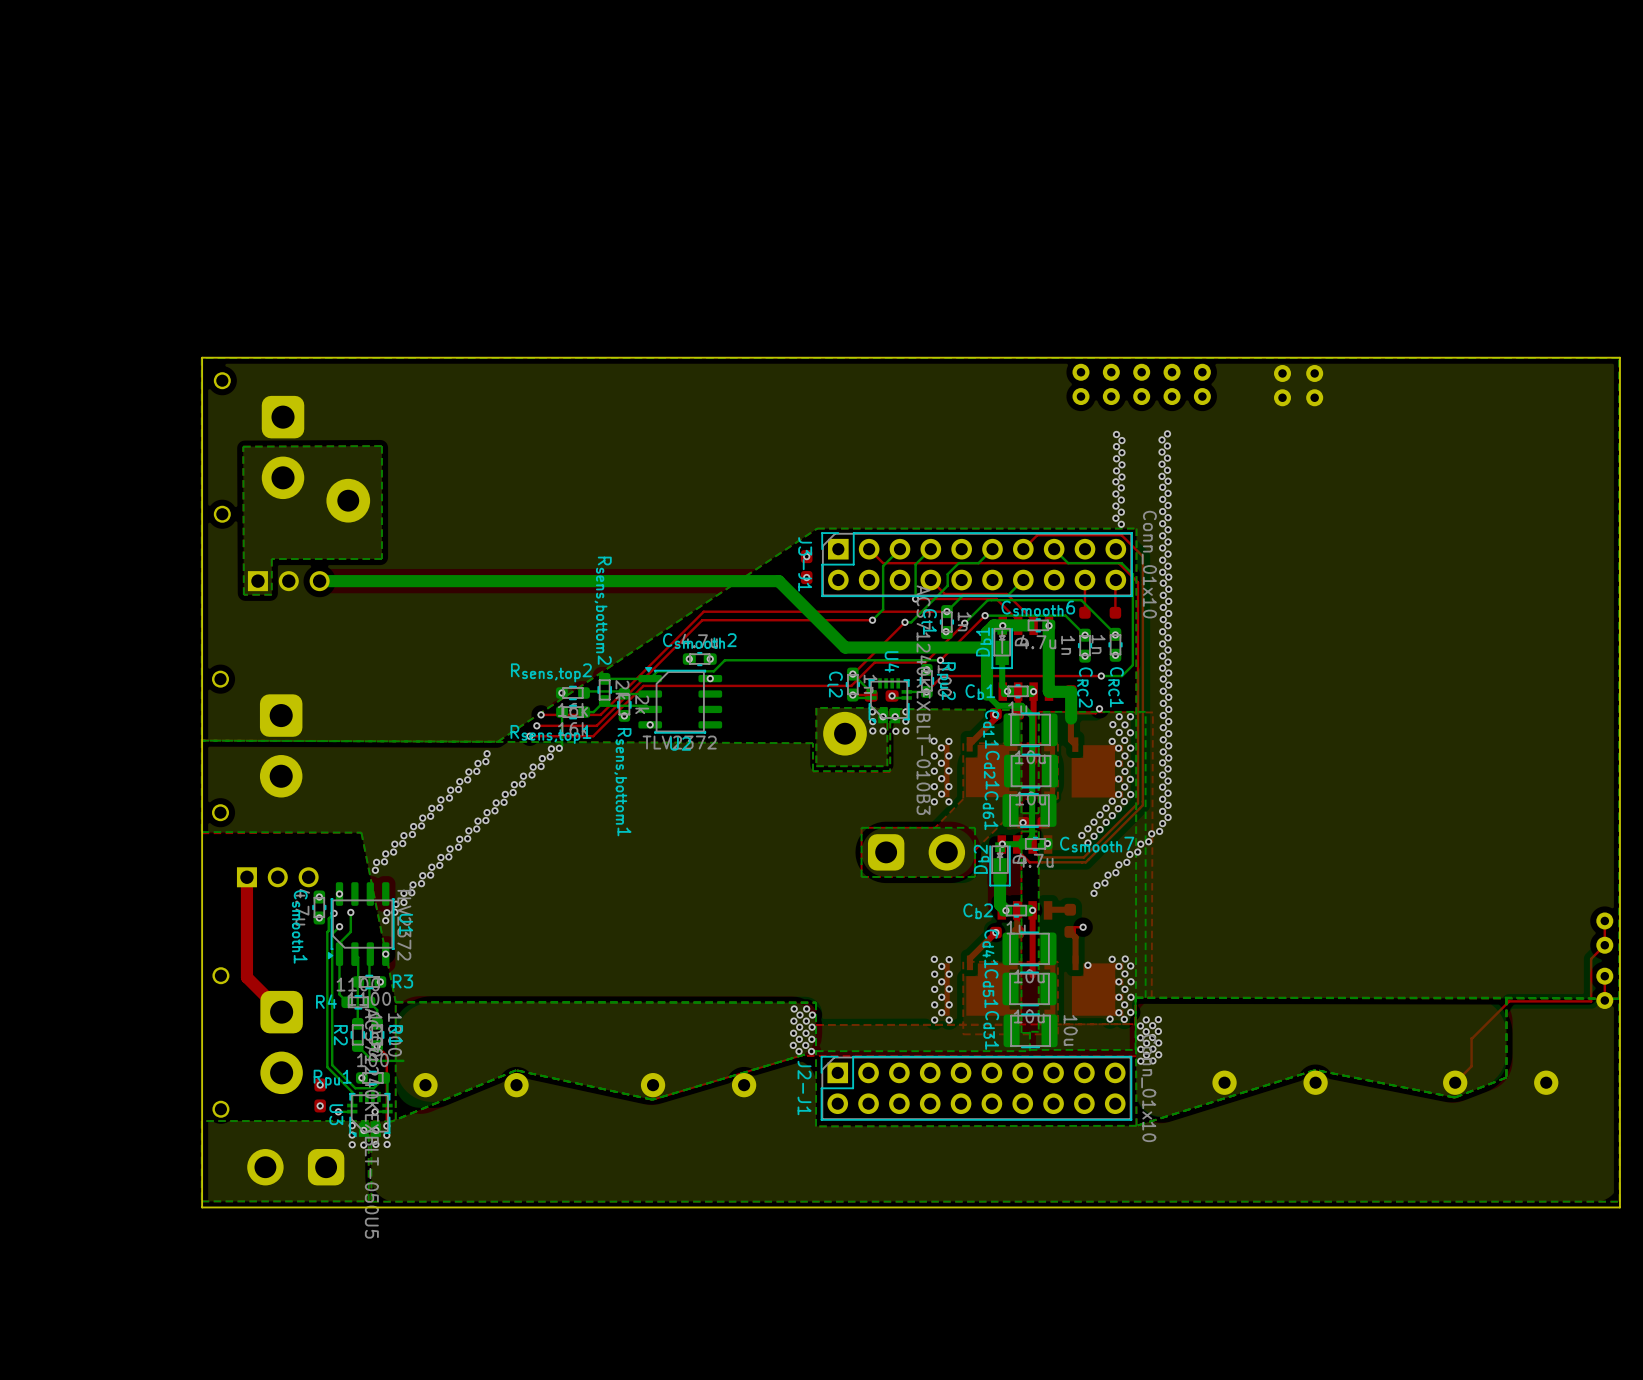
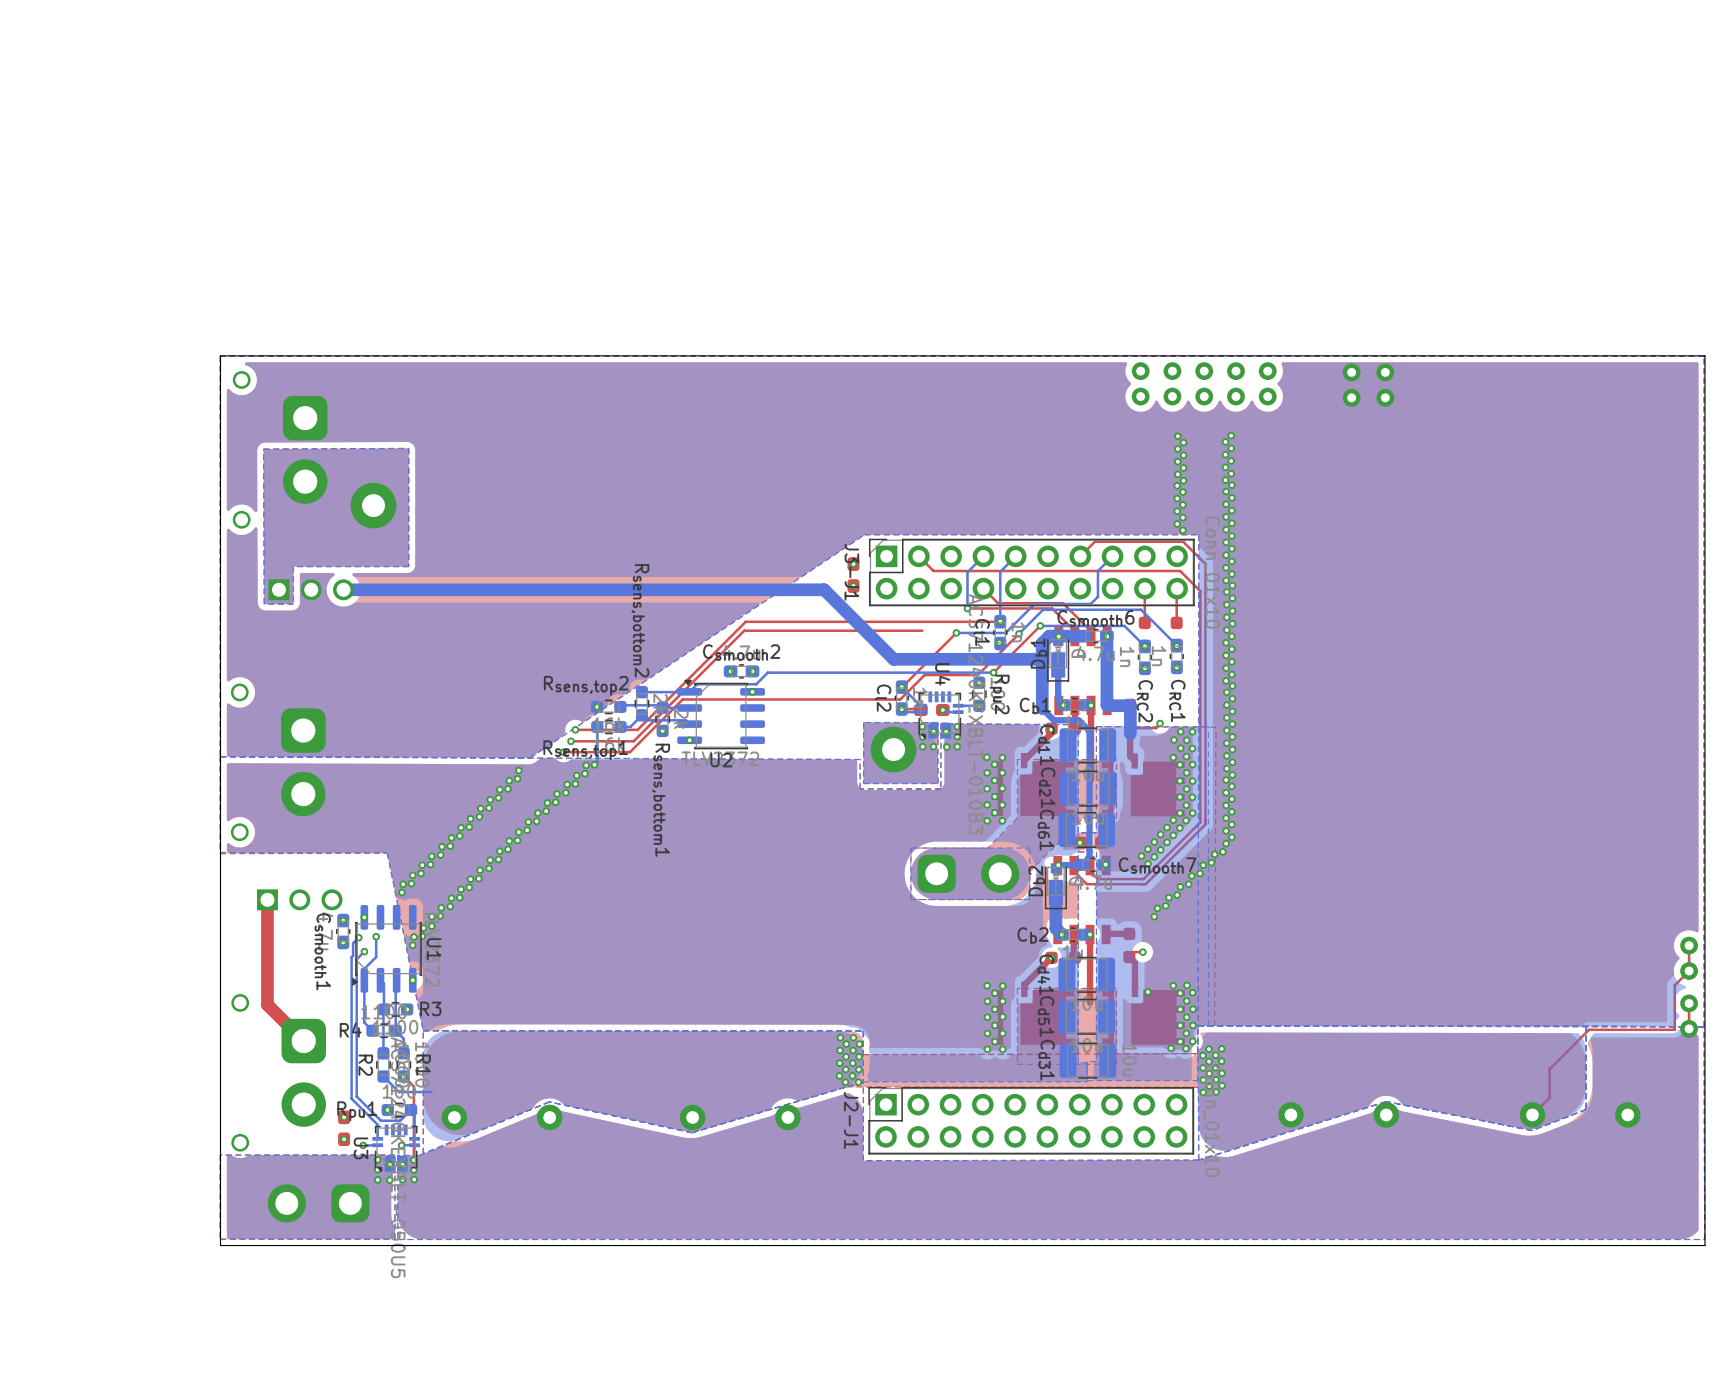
bottom track: (900, 549) (883, 566) (883, 609) (872, 620) -> none
bottom track: (992, 549) (978, 563) (958, 563) (947, 574) (947, 585) (911, 622) -> (1112, 556) (1097, 570) (1097, 596) (1090, 604) (1034, 604) (1005, 632) (962, 632)
bottom track: (1054, 549) (1068, 563) (1121, 563) (1132, 574) (1132, 665) (1121, 676) (1101, 676) -> none
bottom track: (1023, 580) (1008, 595) (963, 595) (946, 611) -> (1015, 556) (1000, 571) (1000, 621)
via: (872, 620) -> none
top track: (1101, 676) (942, 676) (926, 691) -> none
via: (1101, 676) -> none

